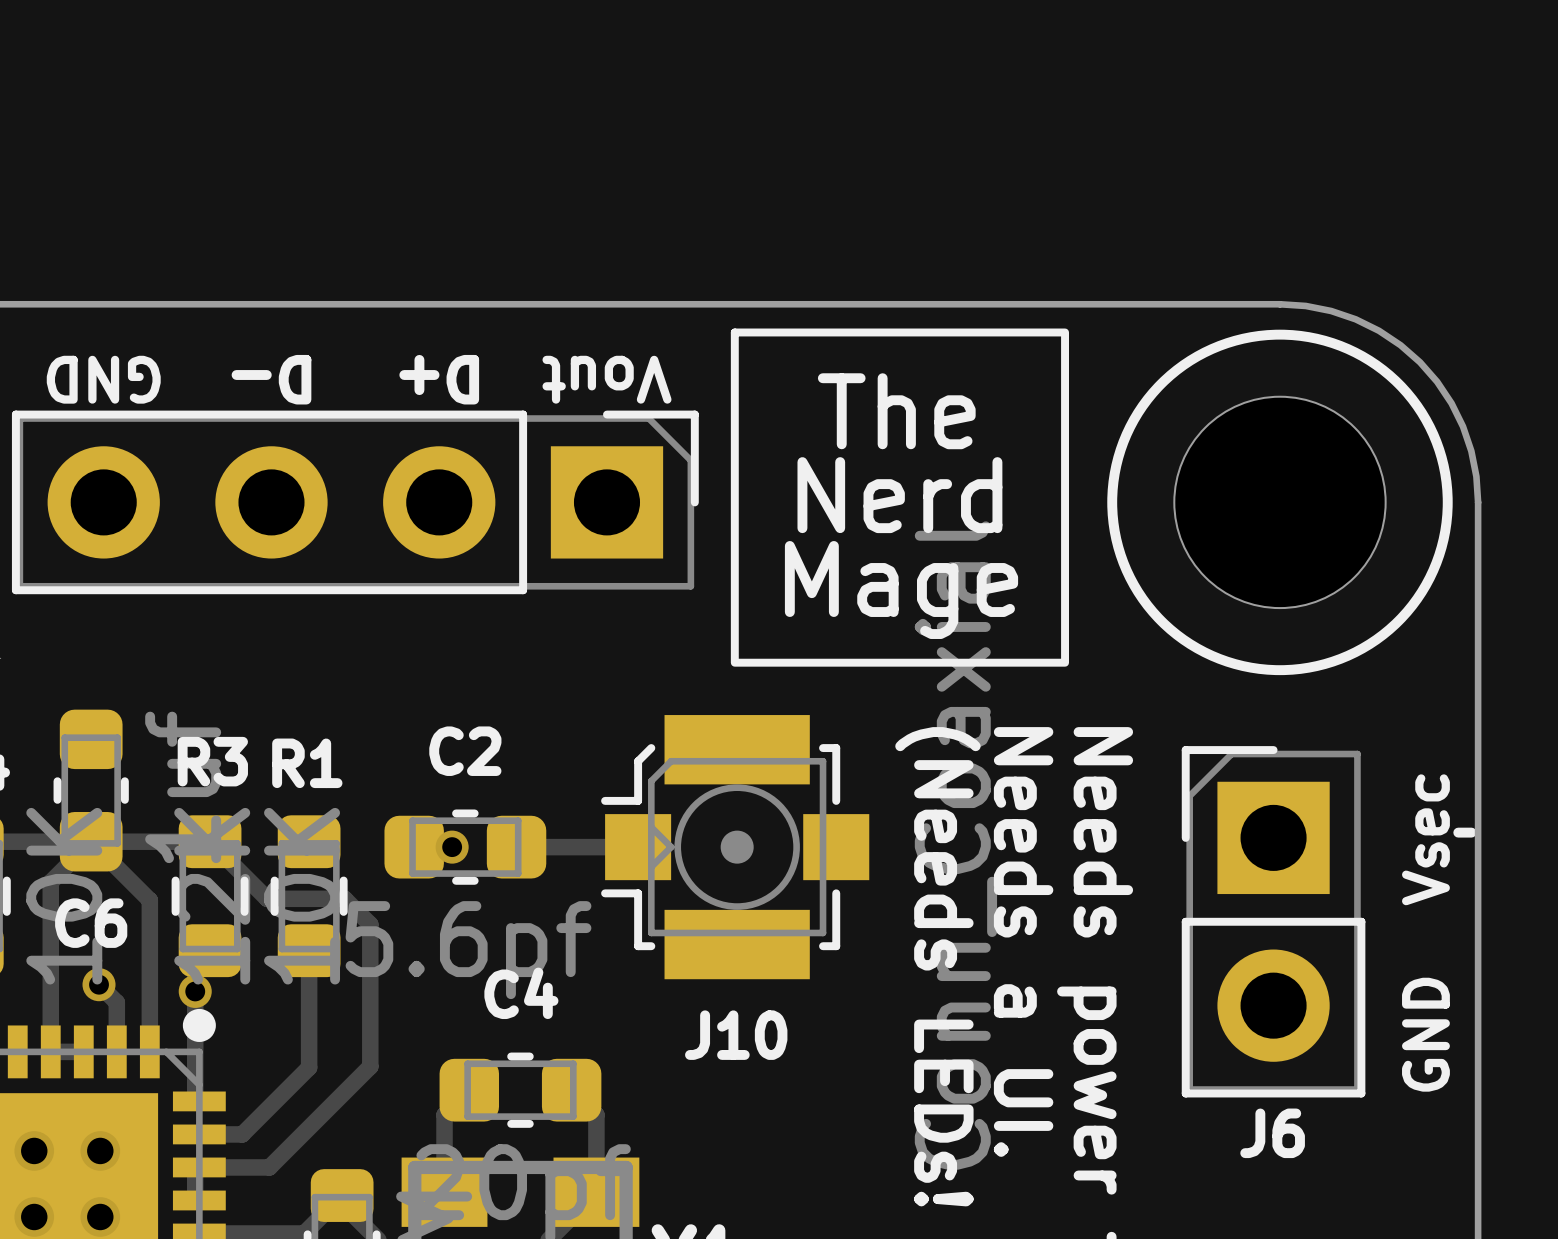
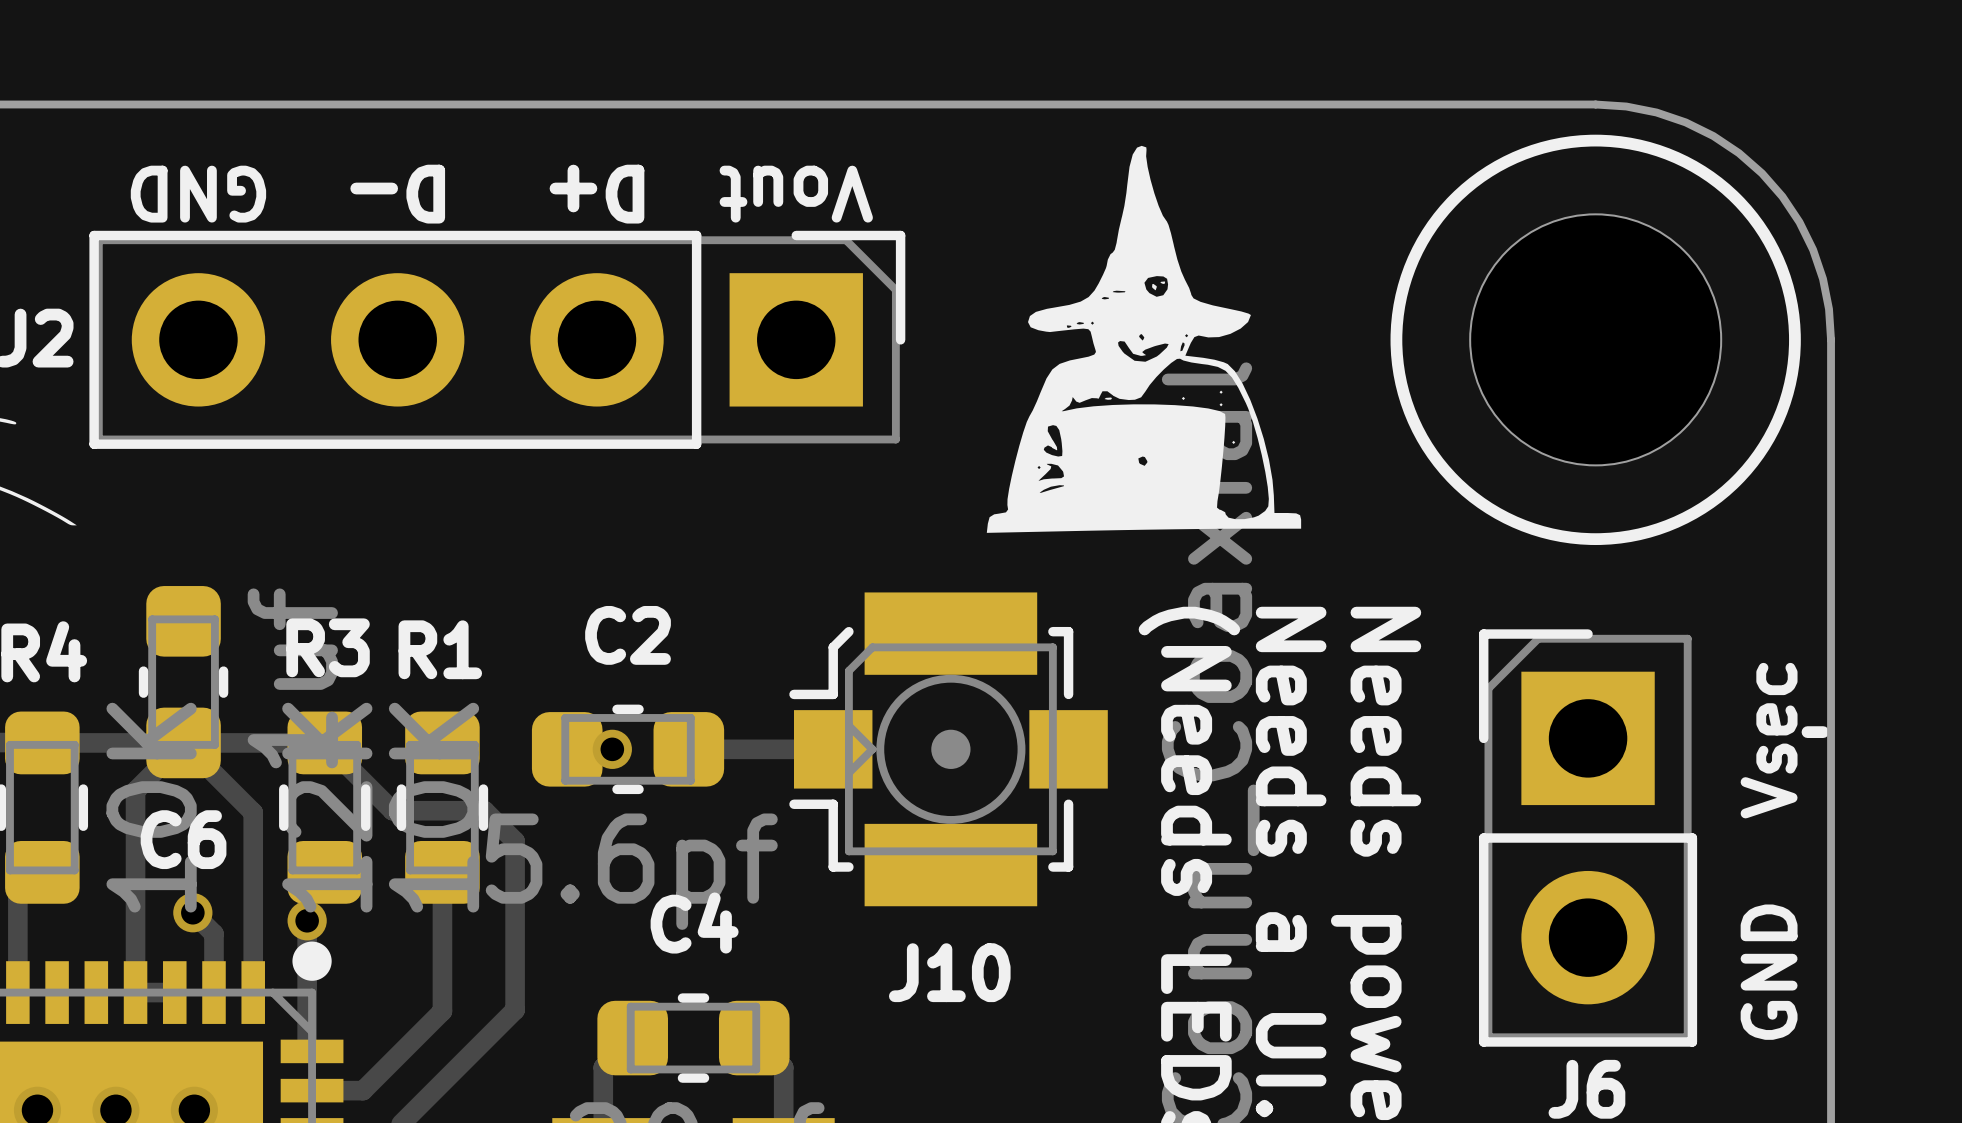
drawing shape: [730, 328, 1070, 667] -> [986, 145, 1302, 533]

